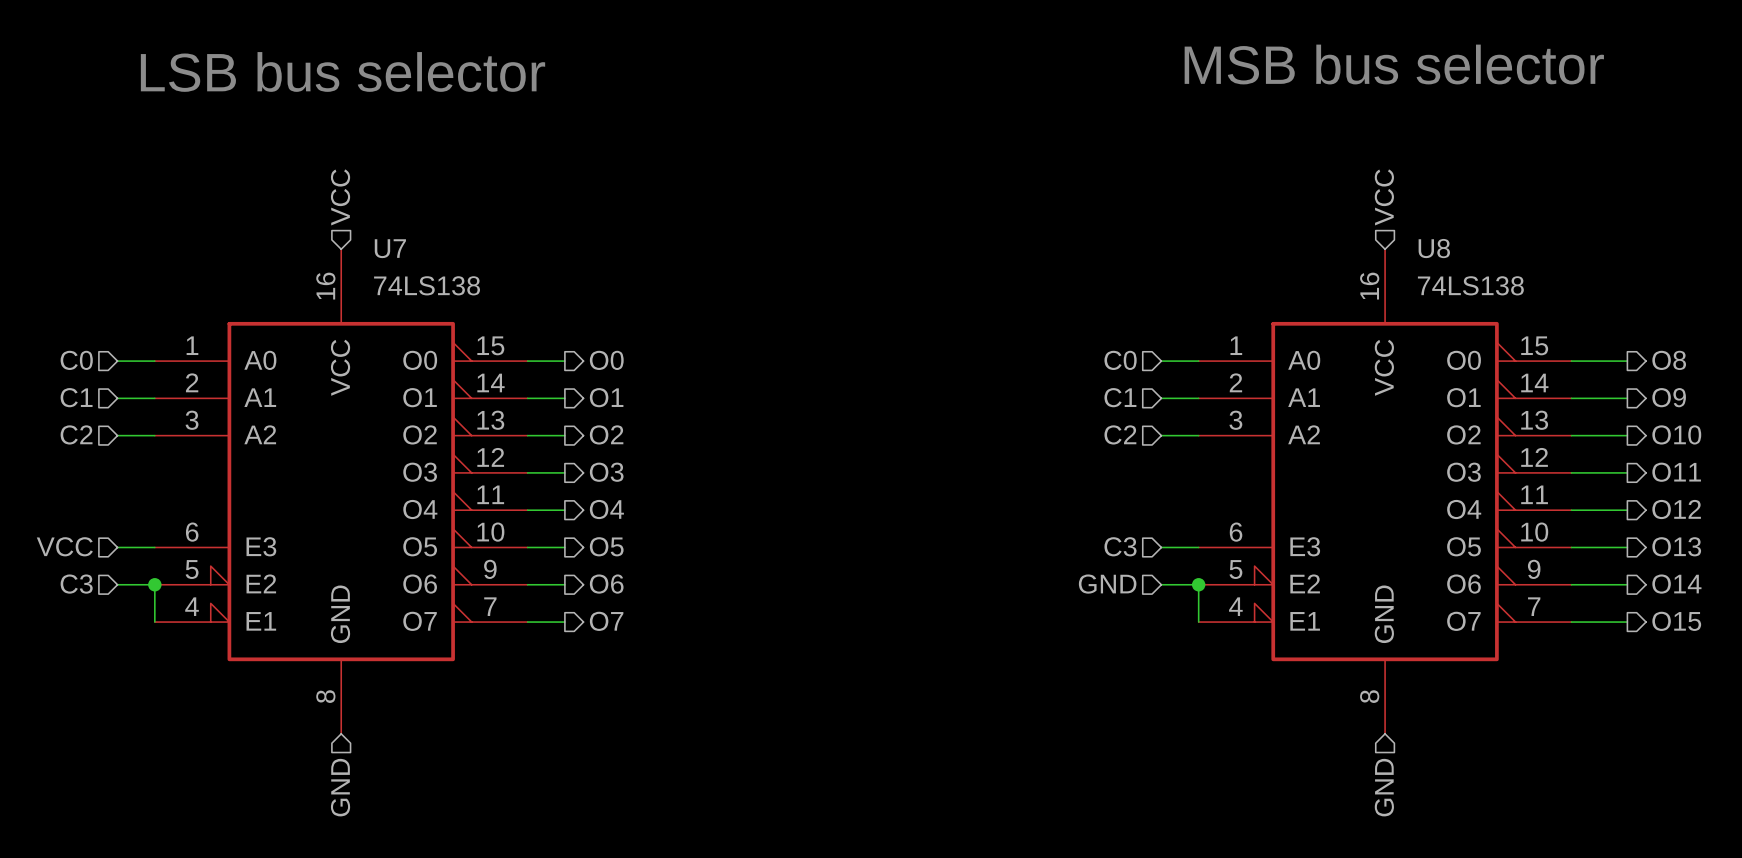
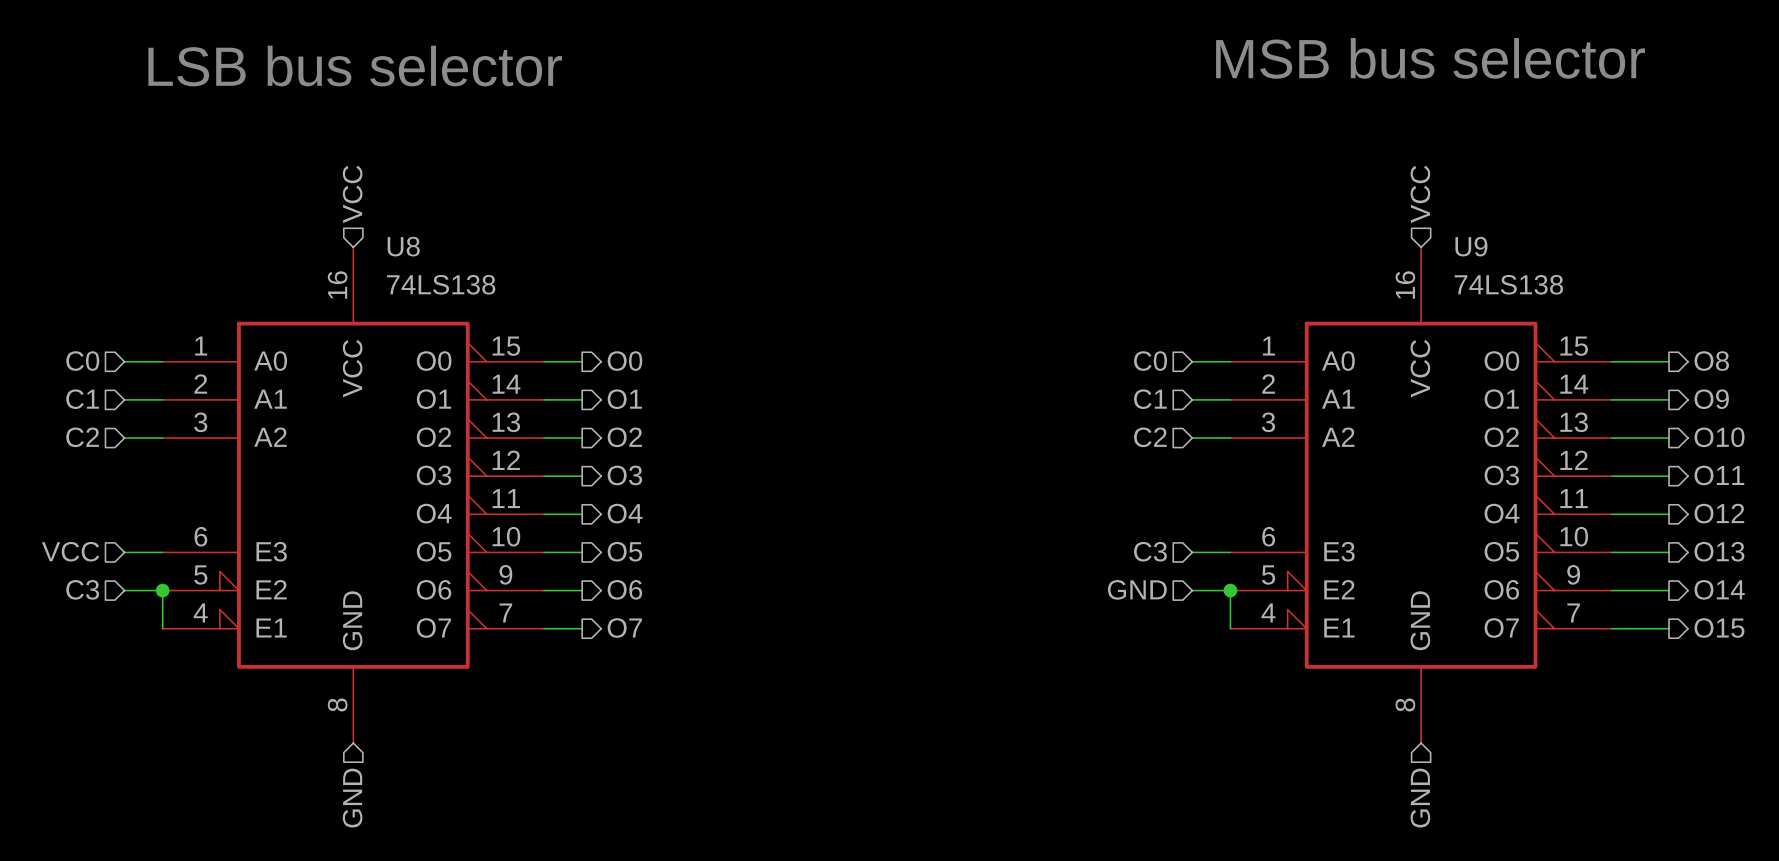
U7 name: U7 (390, 248) -> U8 (403, 246)
U8 name: U8 (1434, 248) -> U9 (1471, 246)

